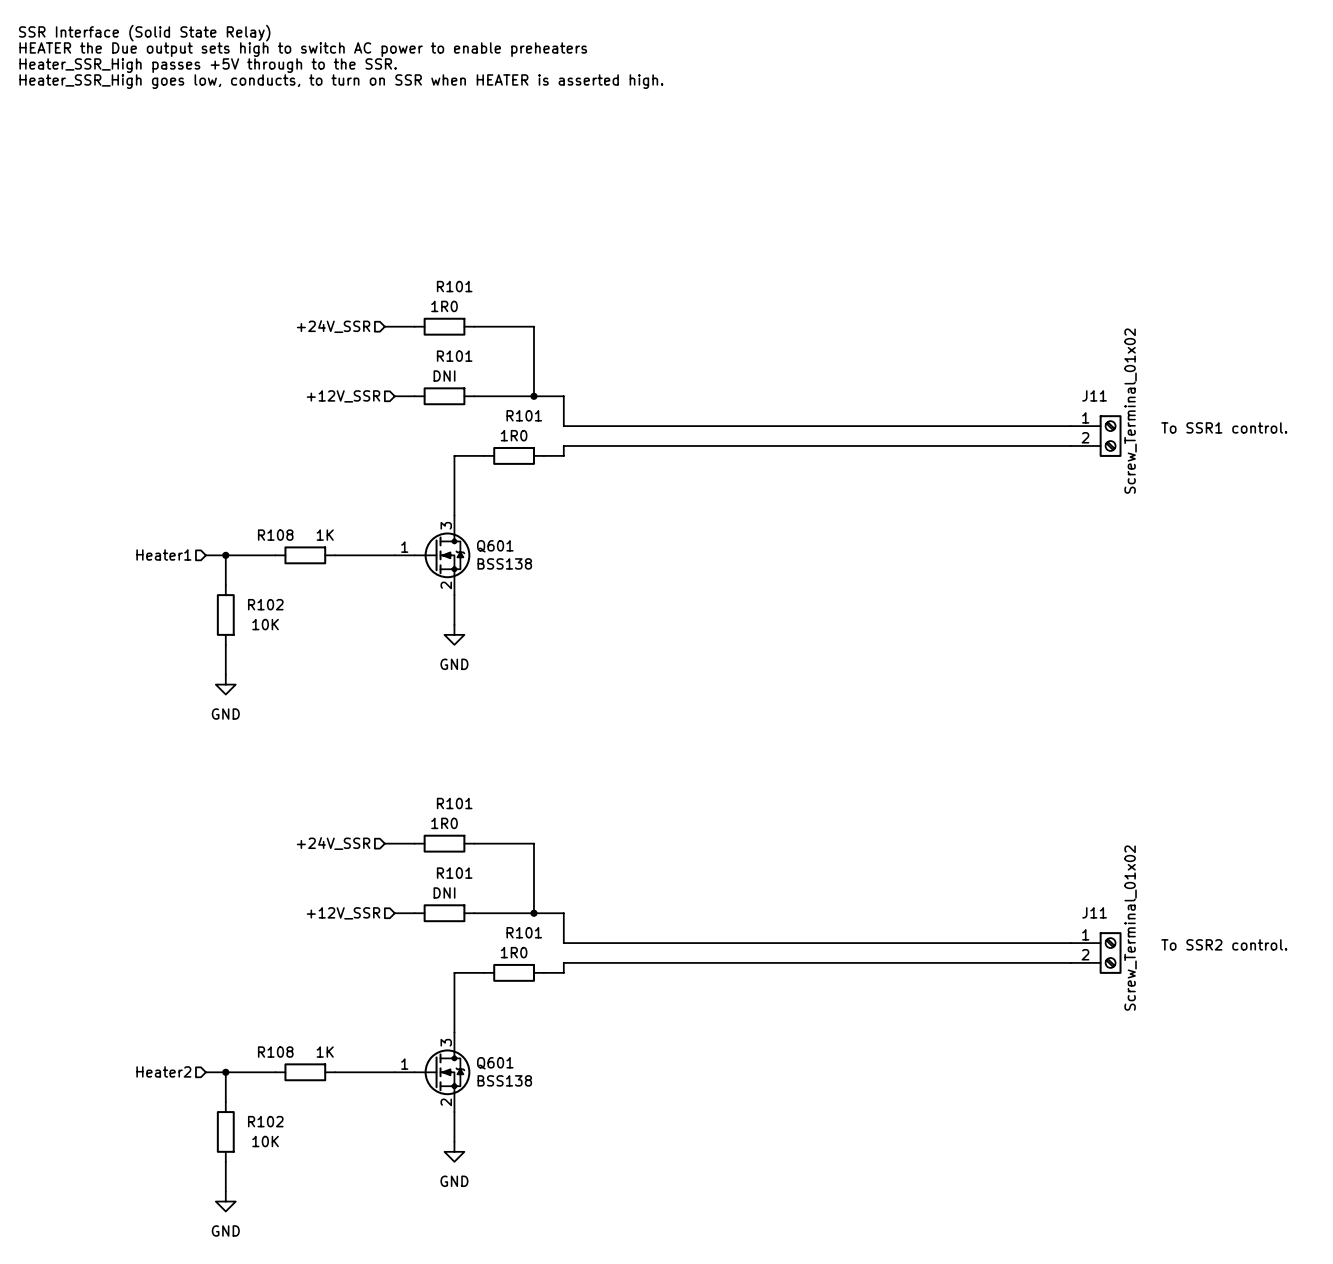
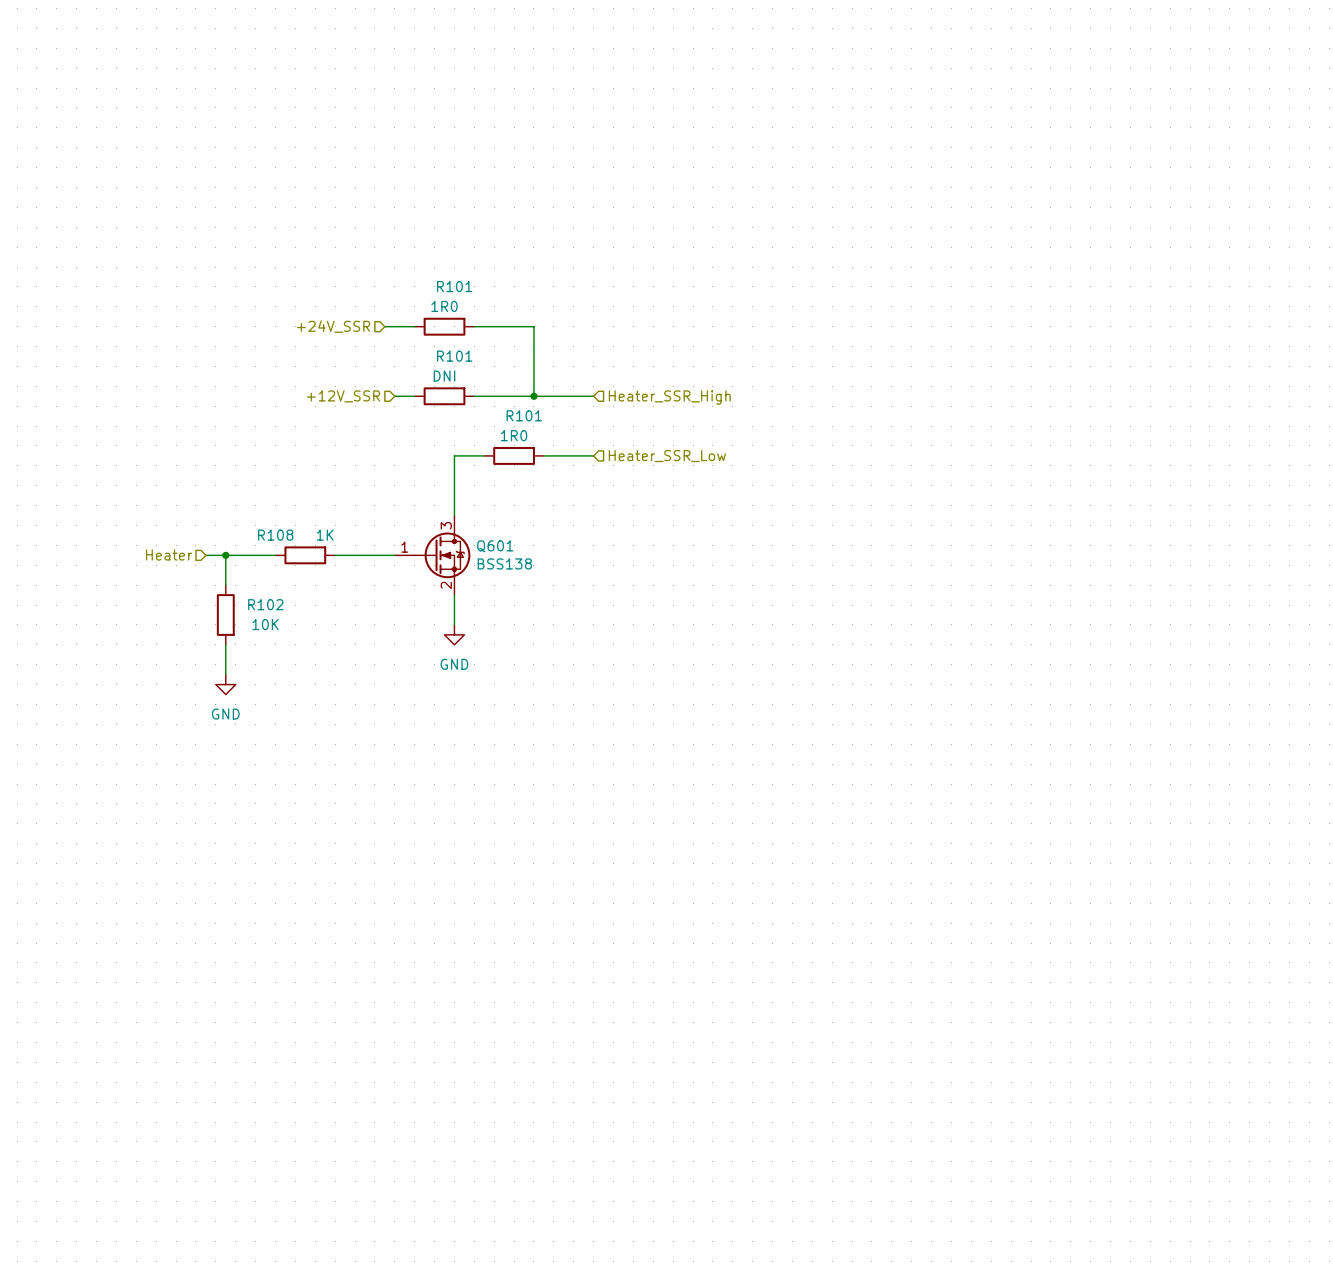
text: SSR Interface (Solid State Relay) (144, 33) -> none
text: HEATER the Due output sets high to switch AC power to enable preheaters (303, 49) -> none
text: Heater_SSR_High passes +5V through to the SSR. (208, 65) -> none
text: Heater_SSR_High goes low, conducts, to turn on SSR when HEATER is asserted high. (341, 81) -> none
wire: (563, 396) (563, 426) (1070, 426) -> (563, 396) (593, 396)
hierarchical label: none -> Heater_SSR_High (669, 397)
text: To SSR1 control. (1224, 427) -> none
J11: Screw_Terminal_01x02 (1096, 436) -> none
wire: (1070, 445) (563, 445) (563, 455) -> (593, 455) (563, 455)
hierarchical label: none -> Heater_SSR_Low (667, 456)
hierarchical label: Heater1 (163, 554) -> Heater (169, 554)
hierarchical label: +24V_SSR (333, 843) -> none
wire: (384, 843) (414, 843) -> none
R101: 1R0 (444, 843) -> none
wire: (474, 843) (533, 843) (533, 913) -> none
hierarchical label: +12V_SSR (343, 913) -> none
wire: (394, 913) (414, 913) -> none
R101: DNI (444, 913) -> none
wire: (474, 913) (563, 913) (563, 943) (1070, 943) -> none
junction: (533, 913) -> none
text: To SSR2 control. (1224, 944) -> none
J11: Screw_Terminal_01x02 (1096, 953) -> none
wire: (1070, 962) (563, 962) (563, 972) (543, 972) -> none
wire: (484, 972) (454, 972) (454, 1032) -> none
R101: 1R0 (514, 972) -> none
hierarchical label: Heater2 (163, 1071) -> none
wire: (205, 1072) (275, 1072) -> none
wire: (225, 1072) (225, 1102) -> none
junction: (225, 1072) -> none
R108: 1K (305, 1072) -> none
wire: (335, 1072) (394, 1072) -> none
Q601: BSS138 (432, 1072) -> none
wire: (454, 1112) (454, 1141) -> none
R102: 10K (225, 1131) -> none
power symbol: GND (454, 1151) -> none
wire: (225, 1161) (225, 1191) -> none
power symbol: GND (225, 1201) -> none

